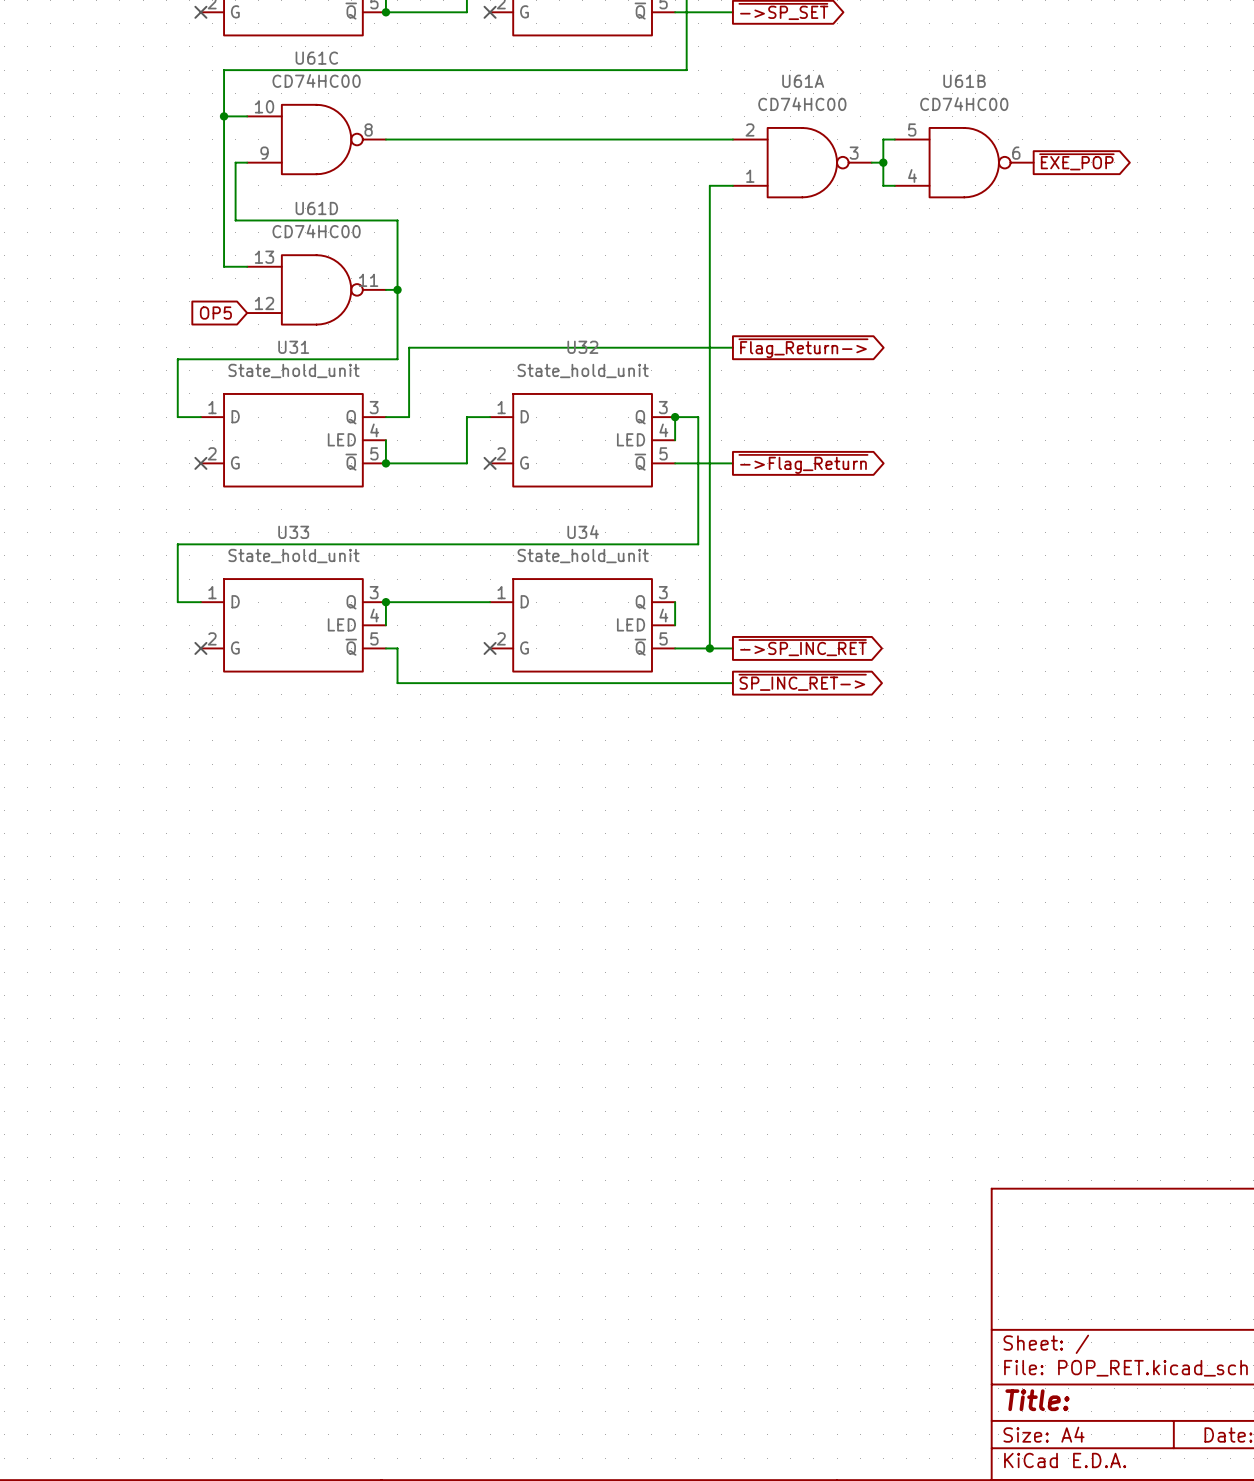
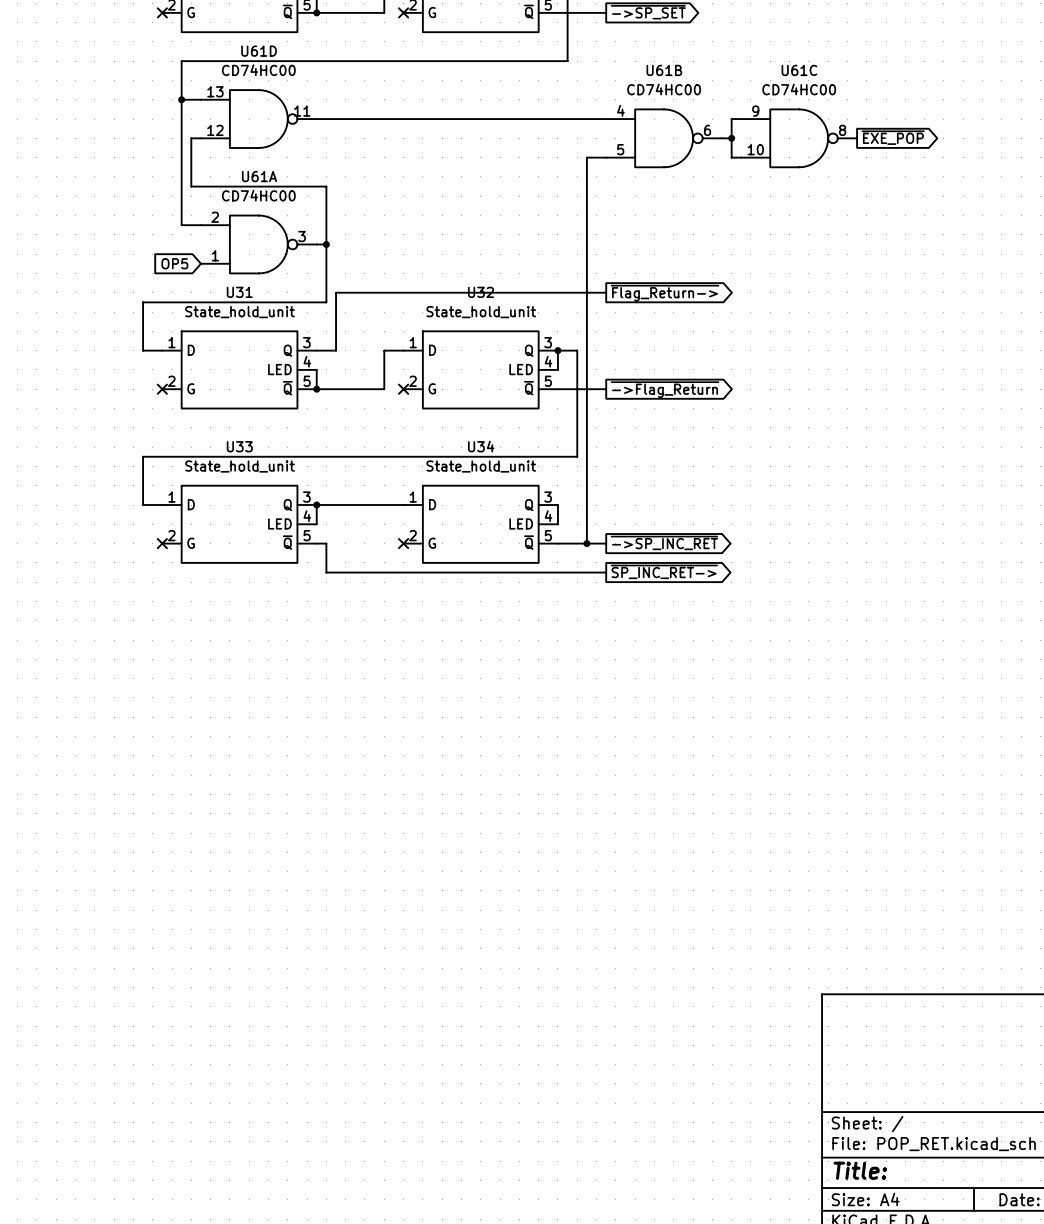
U61C flip: as is (316, 139) -> up-down (799, 138)
U61C position: (316, 139) -> (799, 138)
U61A position: (802, 162) -> (258, 244)
U61B flip: as is (964, 162) -> up-down (664, 138)
U61B position: (964, 162) -> (664, 138)
U61D position: (316, 289) -> (258, 119)

